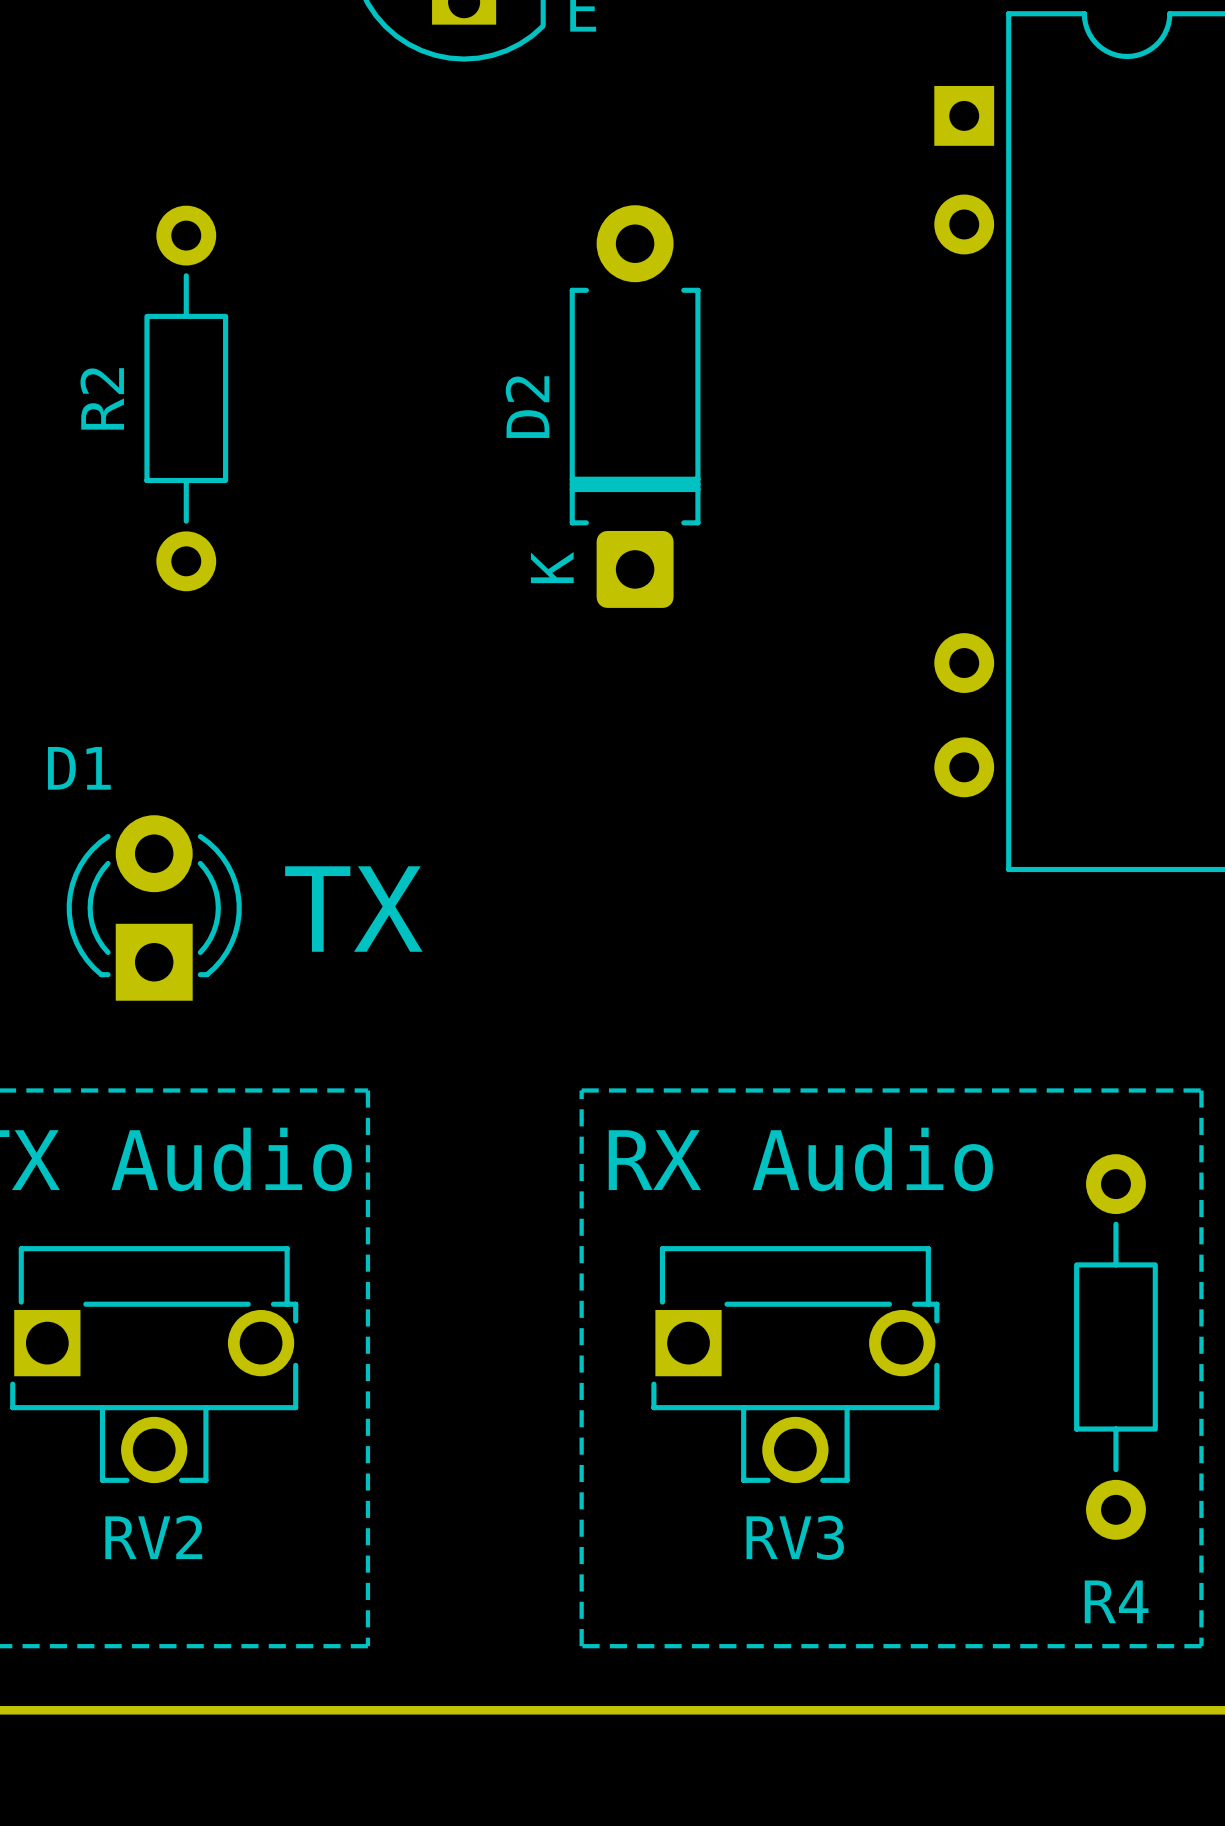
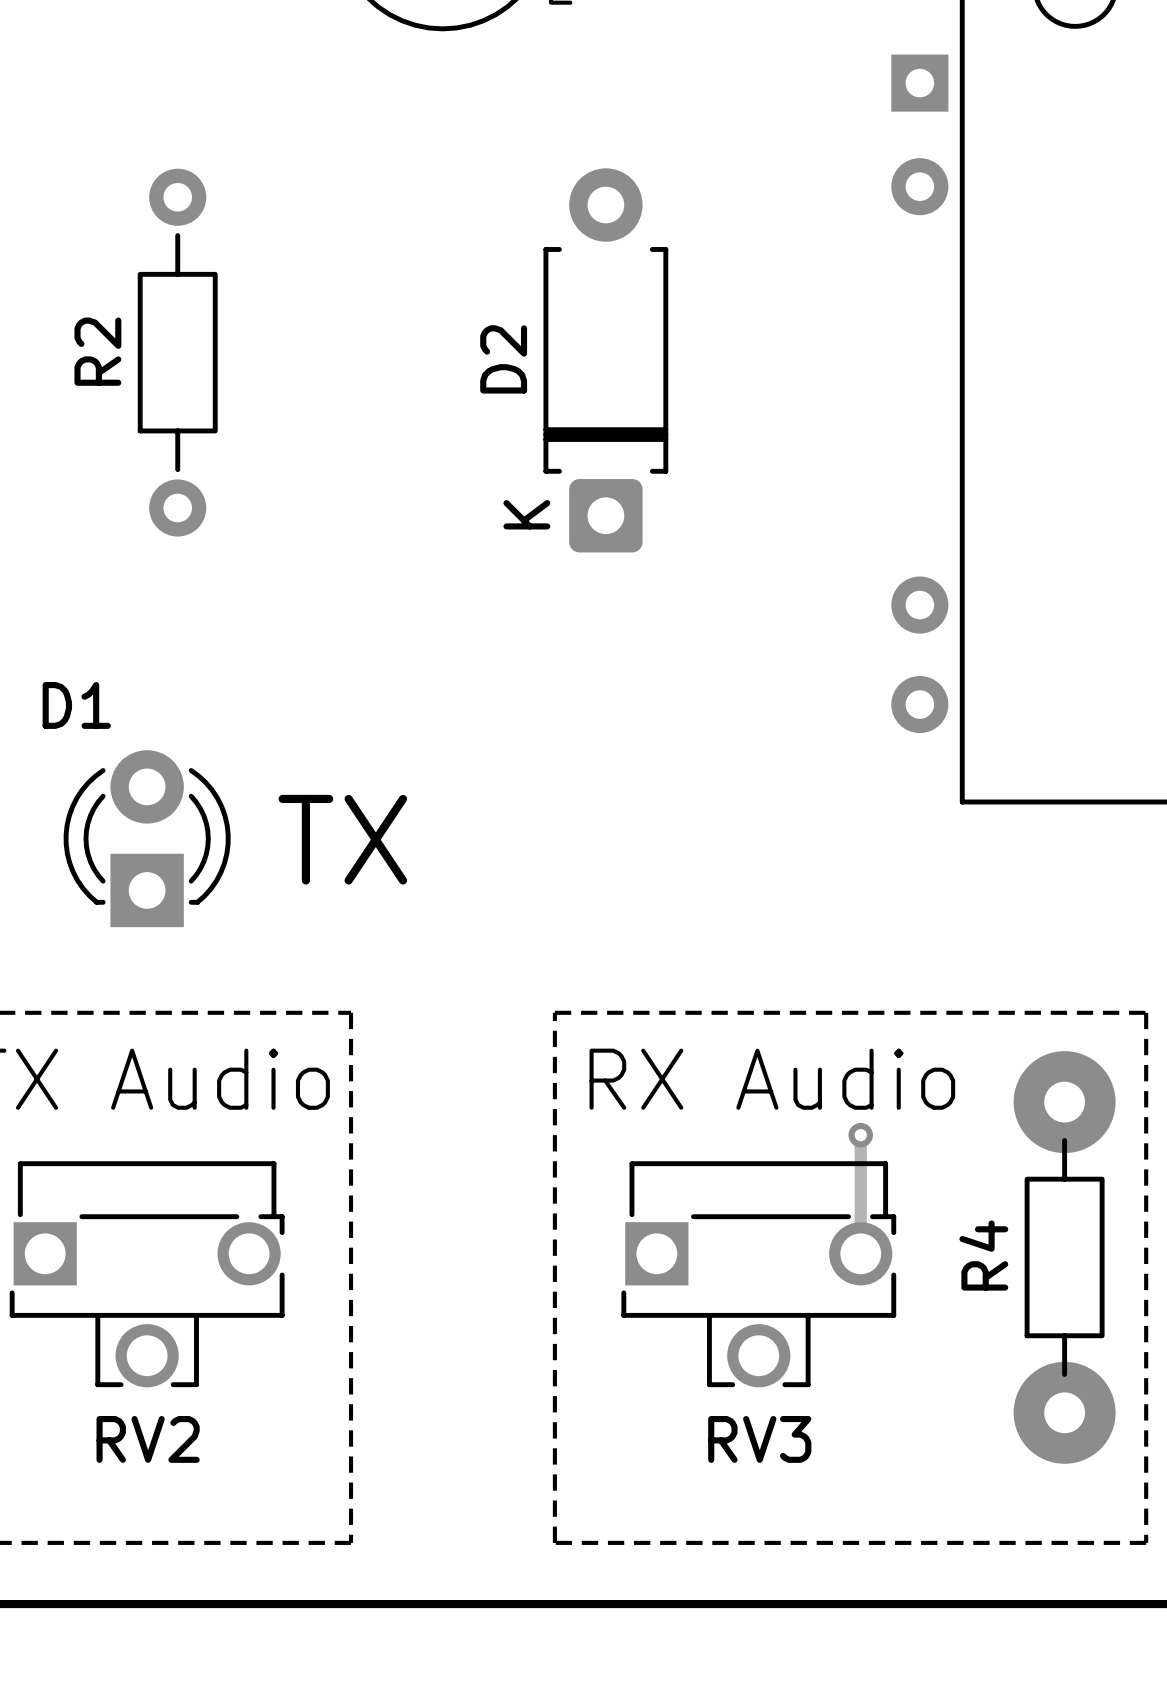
R4 footprint: [1074, 1154, 1158, 1540] -> [1013, 1051, 1116, 1464]
track: none -> (860, 1135) (860, 1253)
via: none -> (860, 1135)
R4 name rotation: 0° (1116, 1601) -> 90° counterclockwise (983, 1255)
R4 name position: R4 (1116, 1601) -> R4 (983, 1255)

